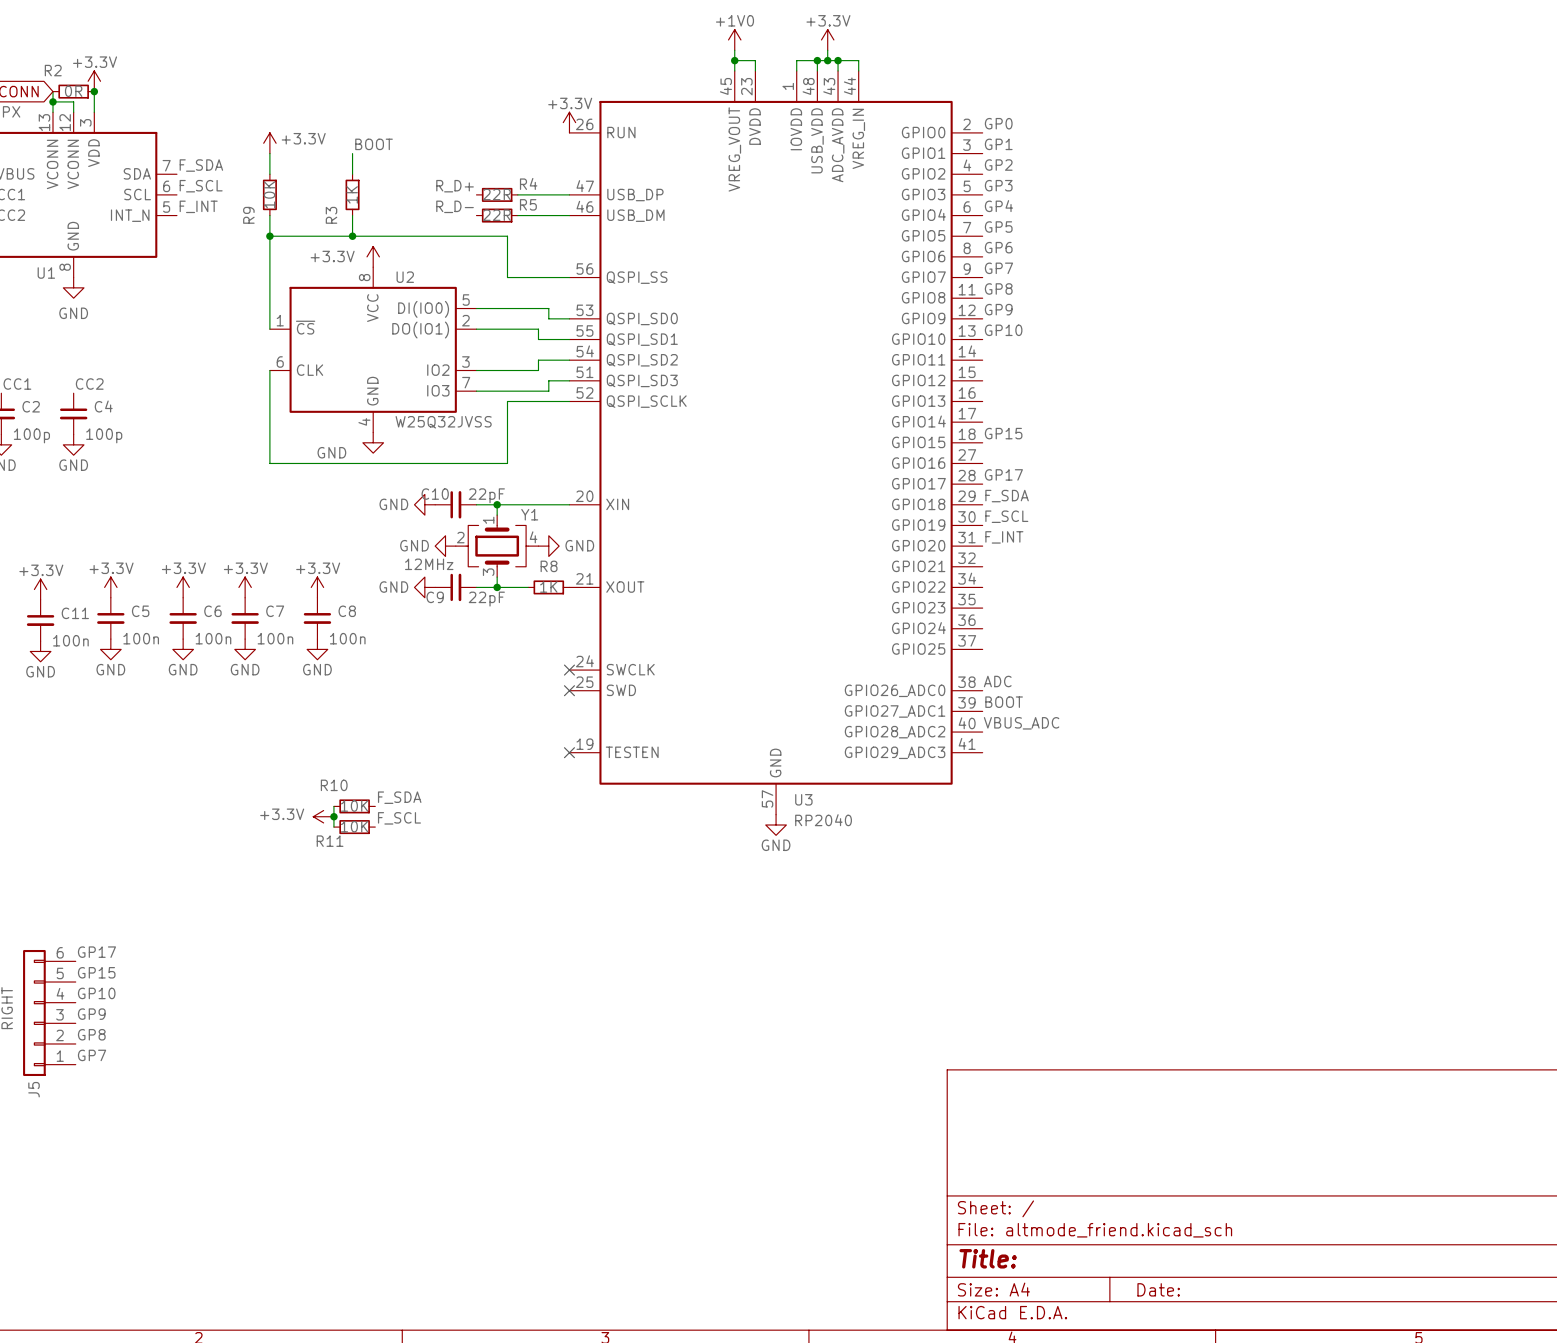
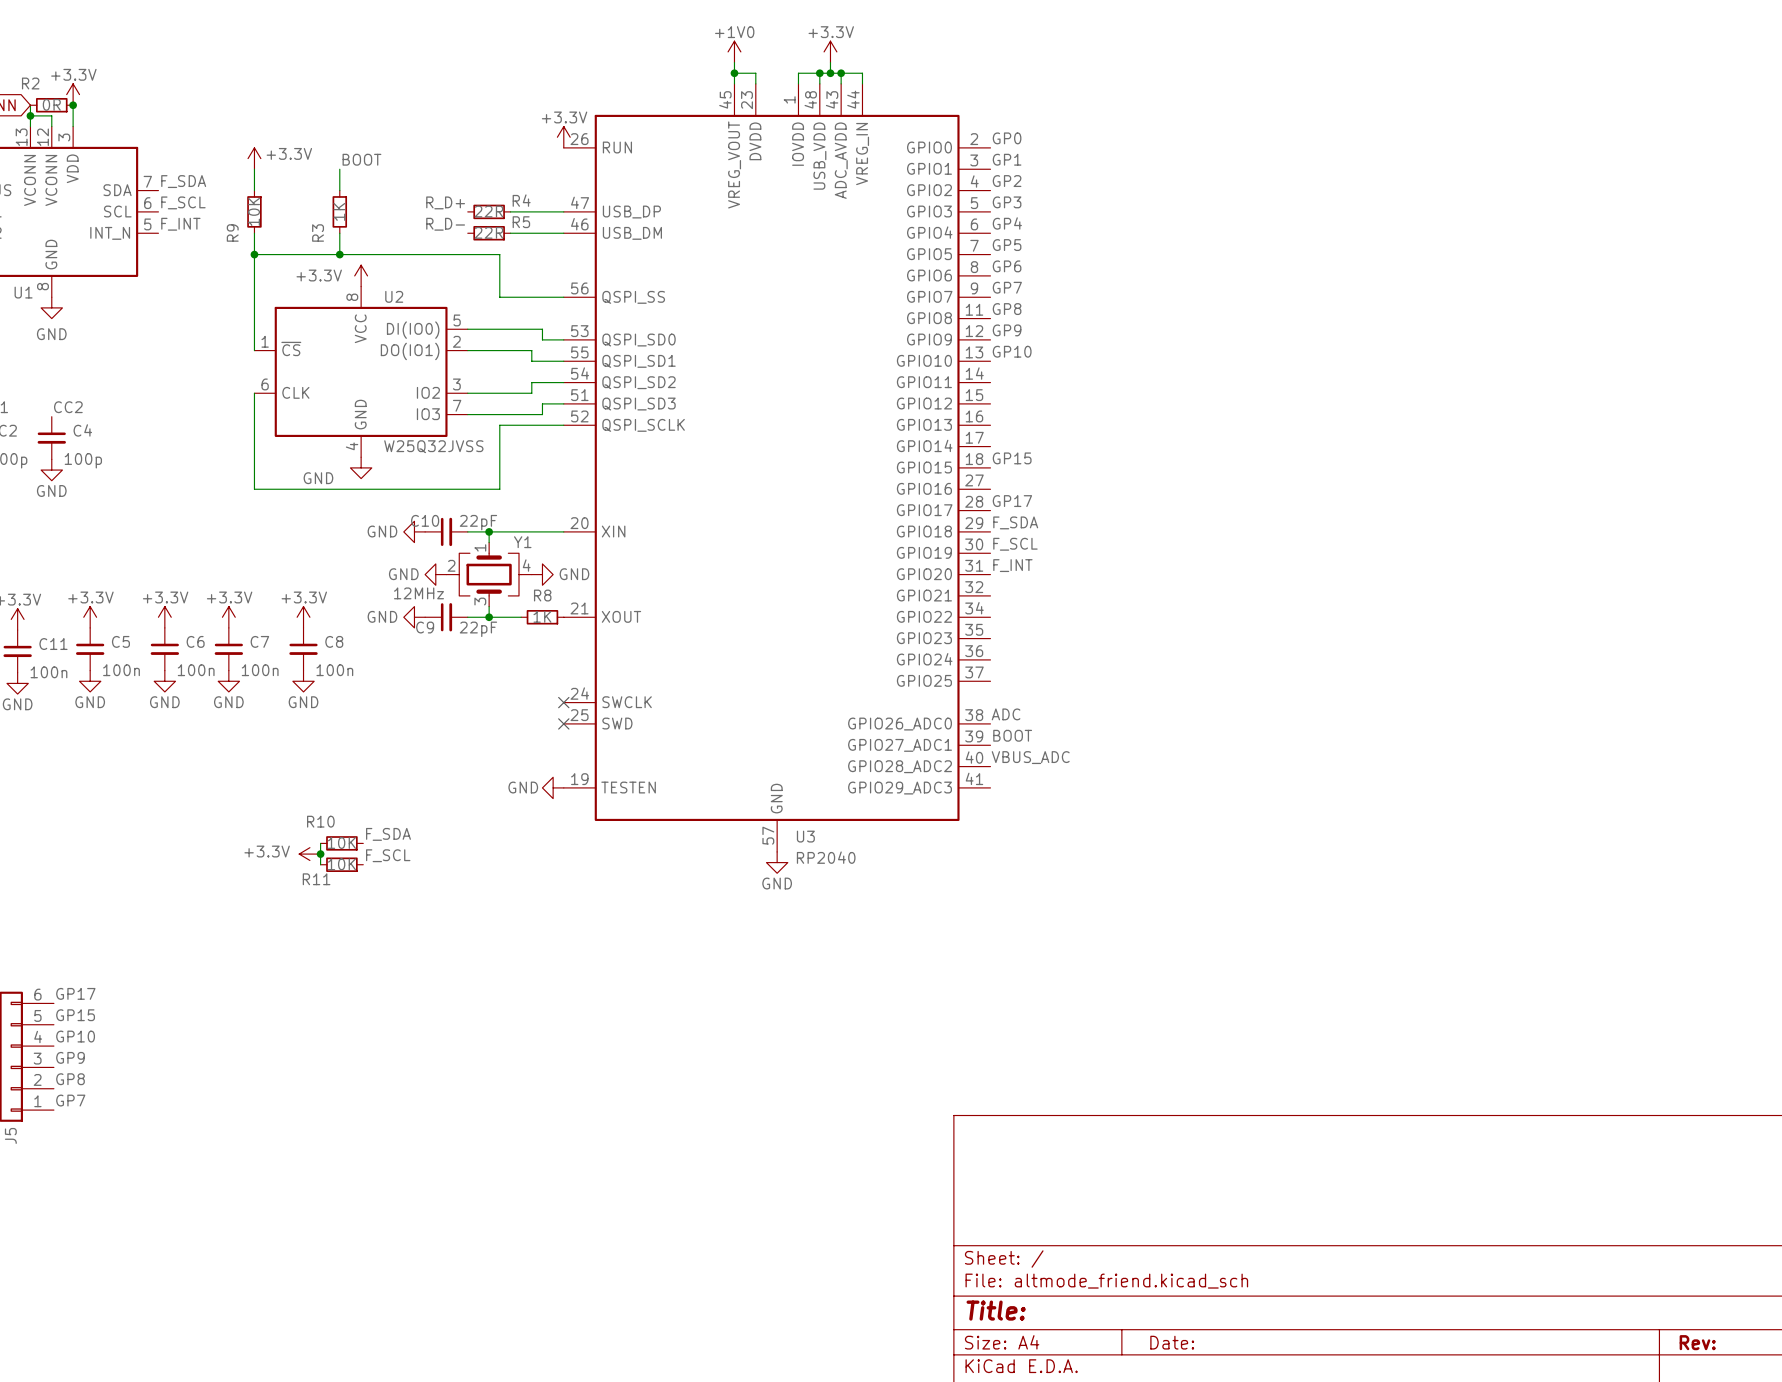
power symbol: none -> GND (553, 787)
no-connect mark: (569, 752) -> none

